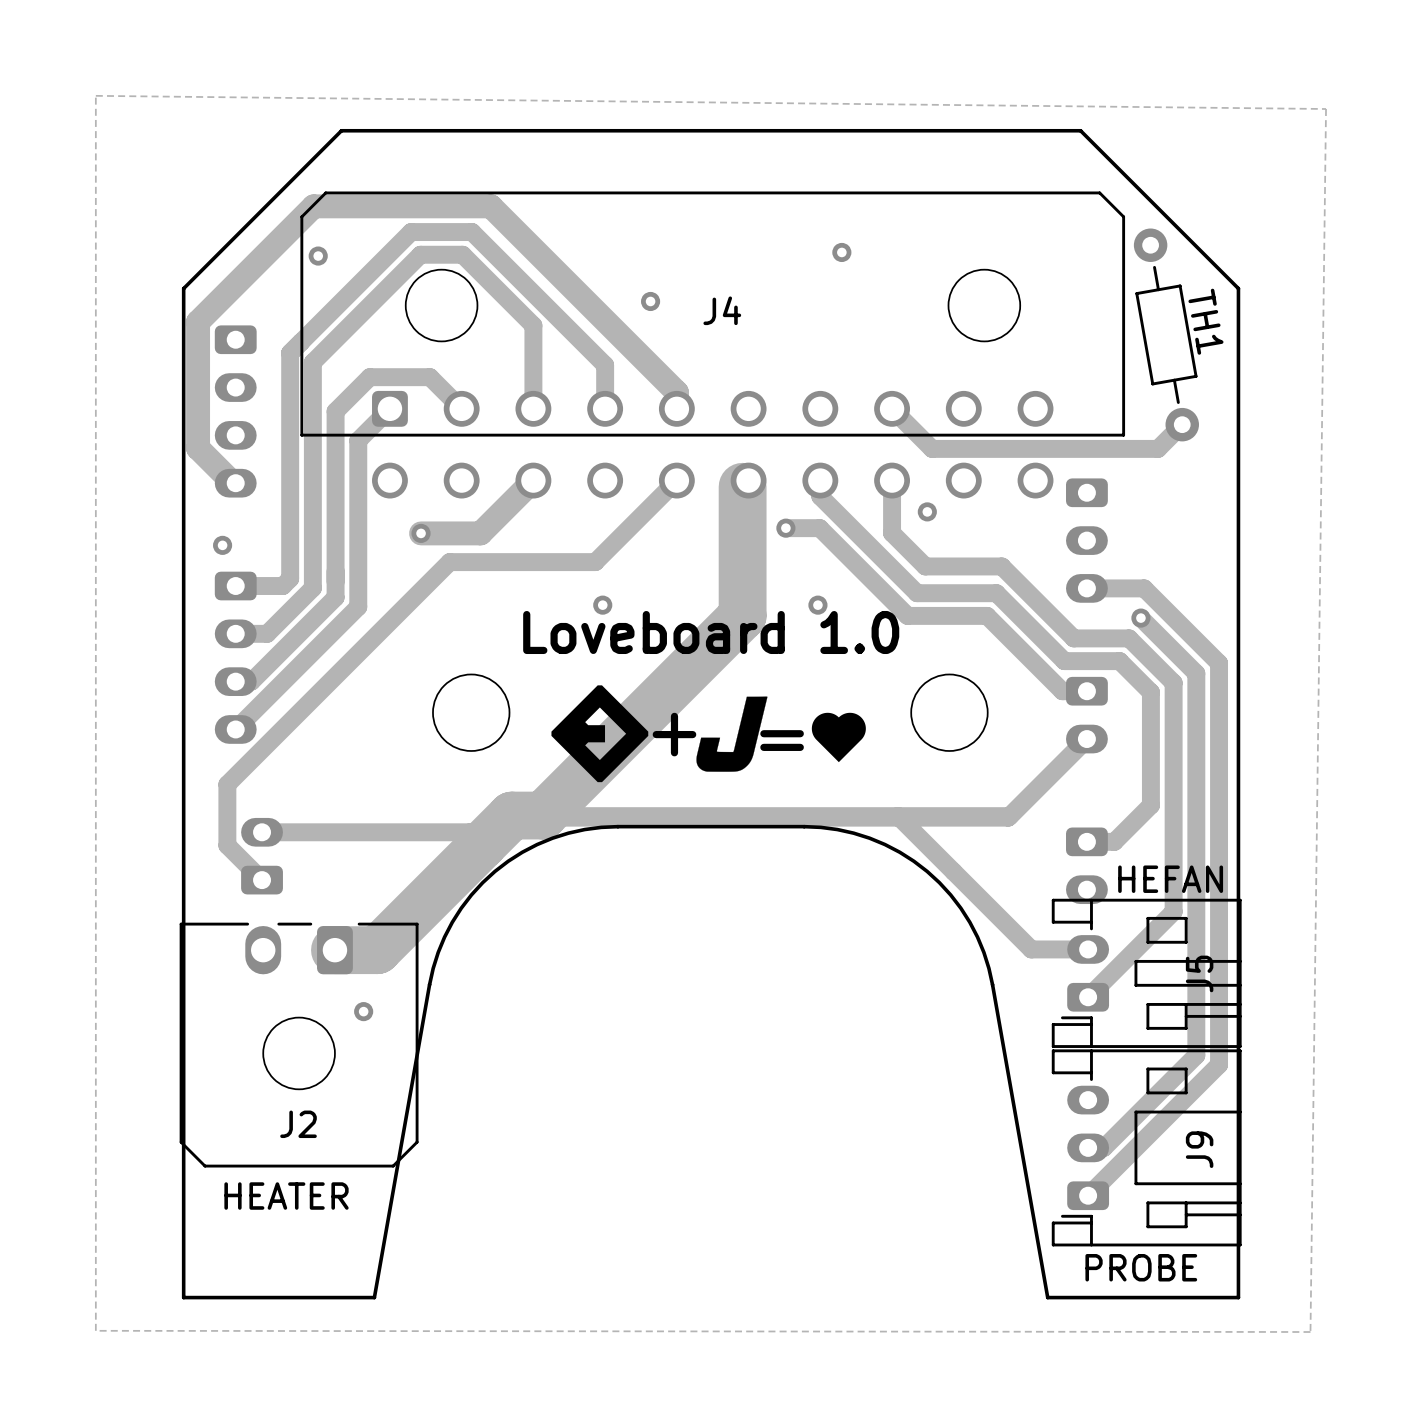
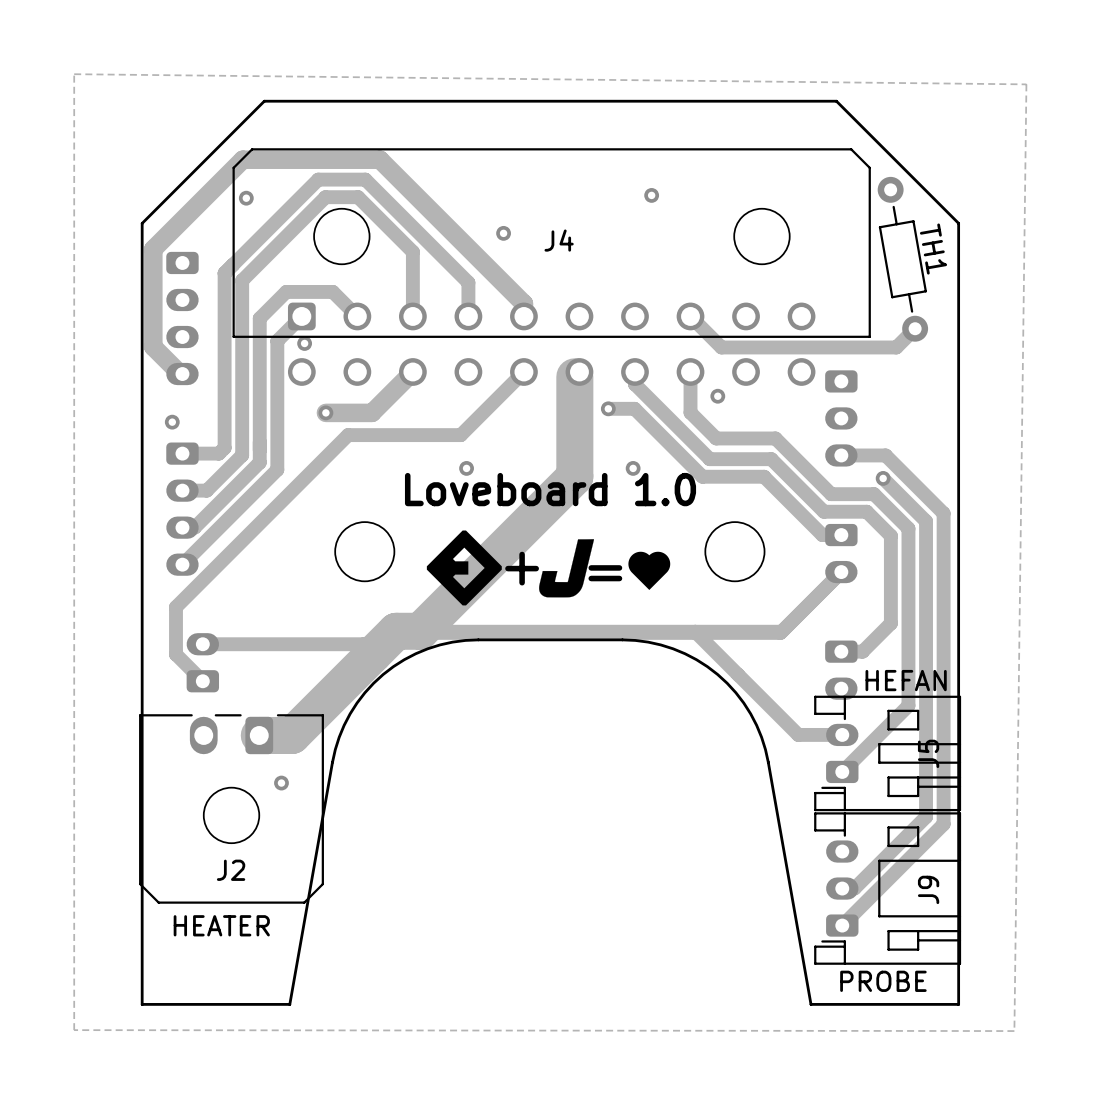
via: none -> (304, 343)

